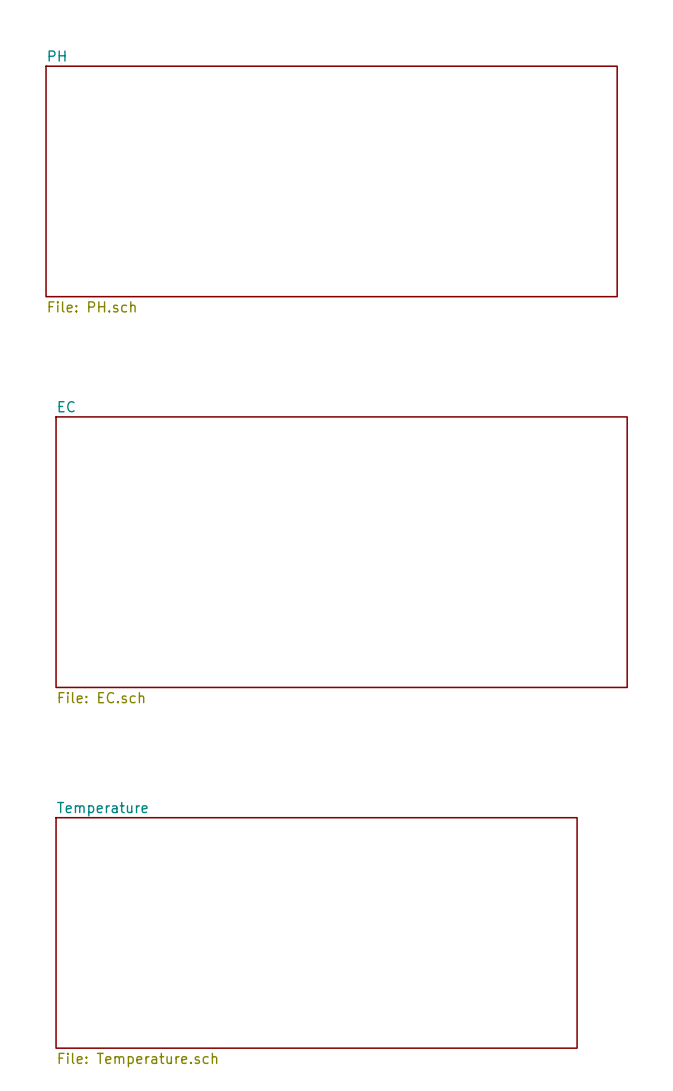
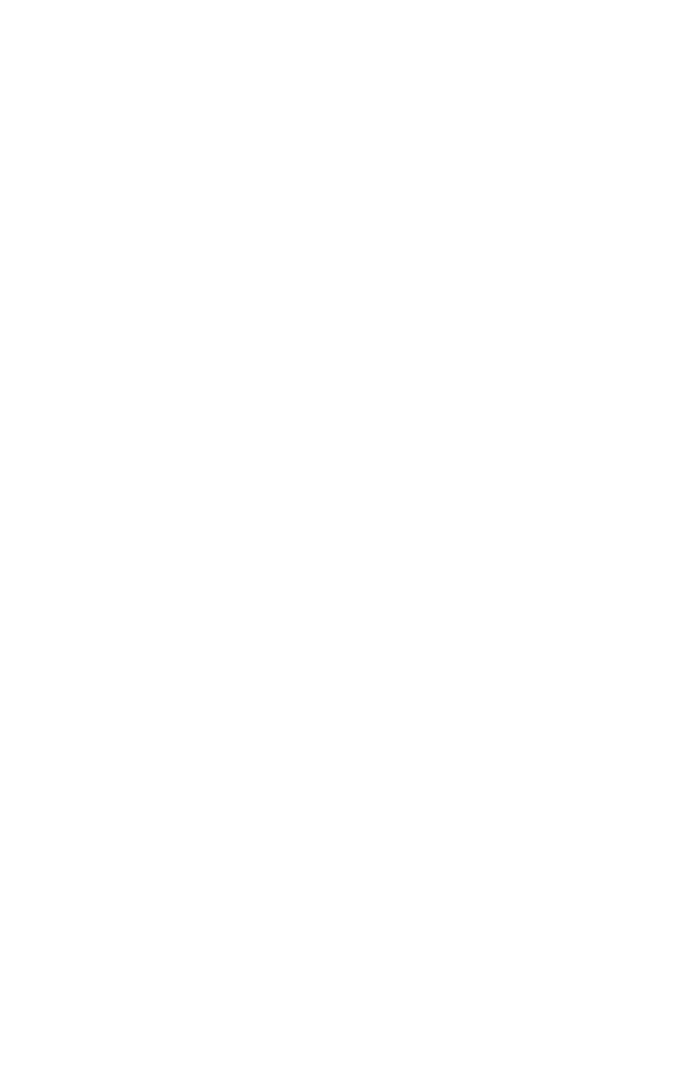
sheet PH: File: PH.sch (331, 181) -> none
sheet EC: File: EC.sch (341, 552) -> none
sheet Temperature: File: Temperature.sch (316, 932) -> none

